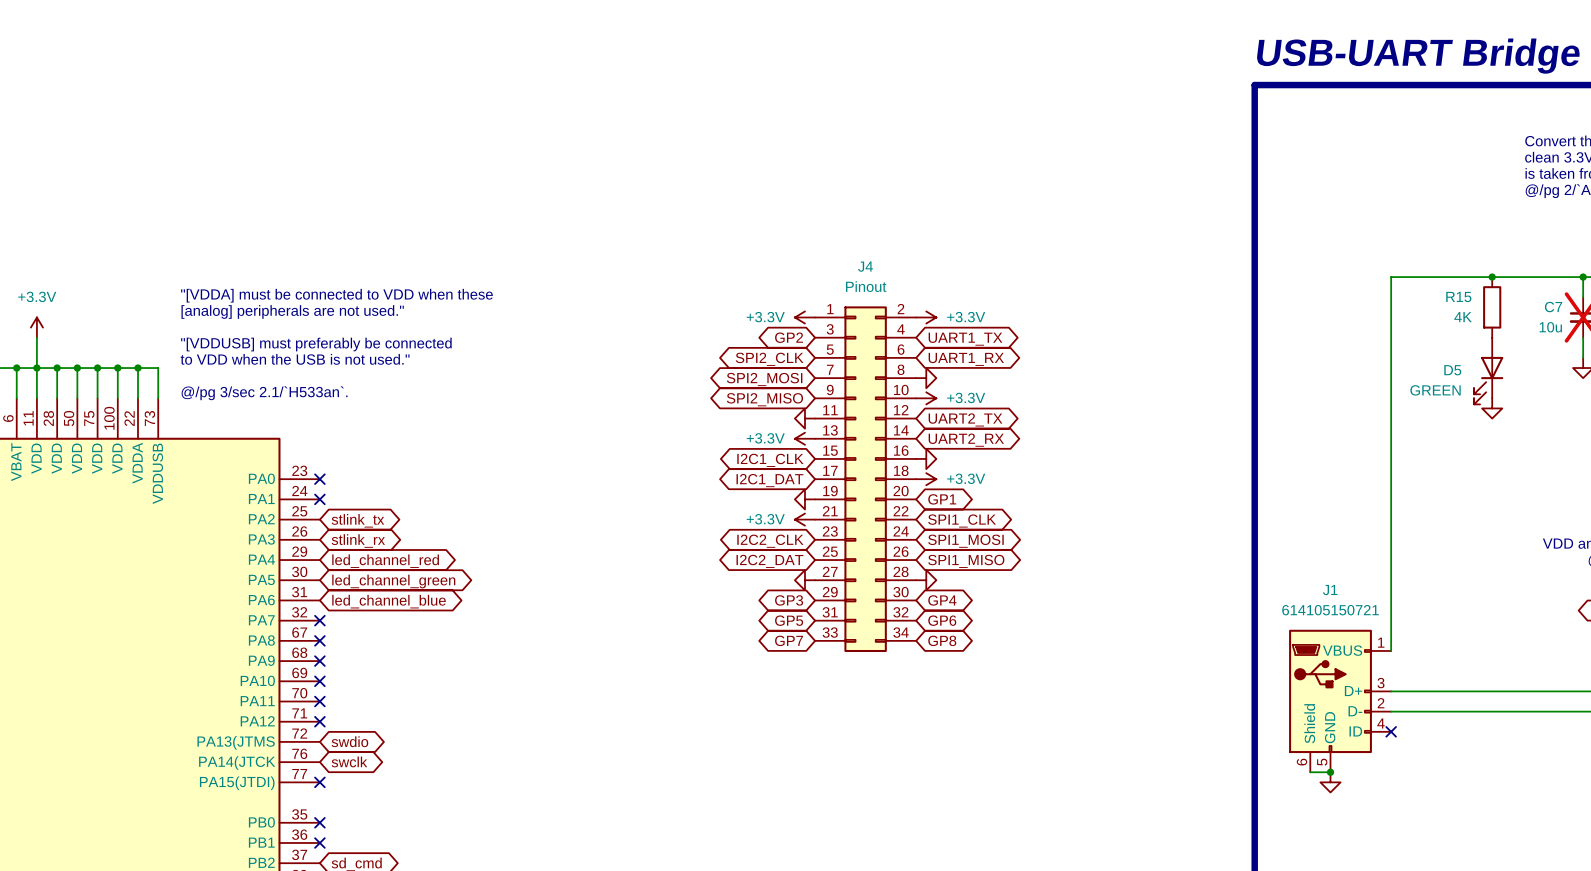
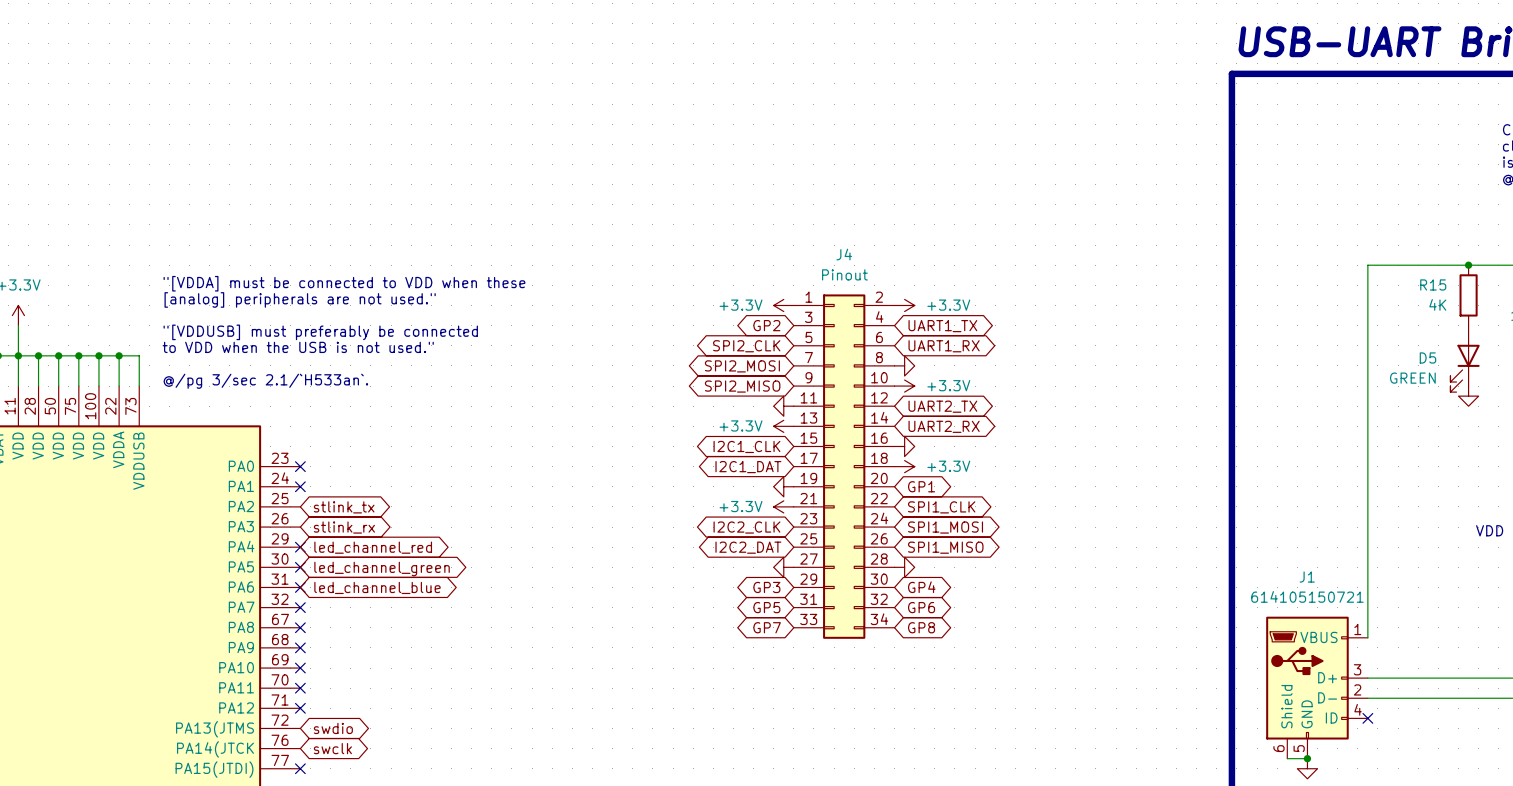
no-connect mark: none -> (300, 547)
no-connect mark: none -> (300, 567)
no-connect mark: none -> (300, 587)

